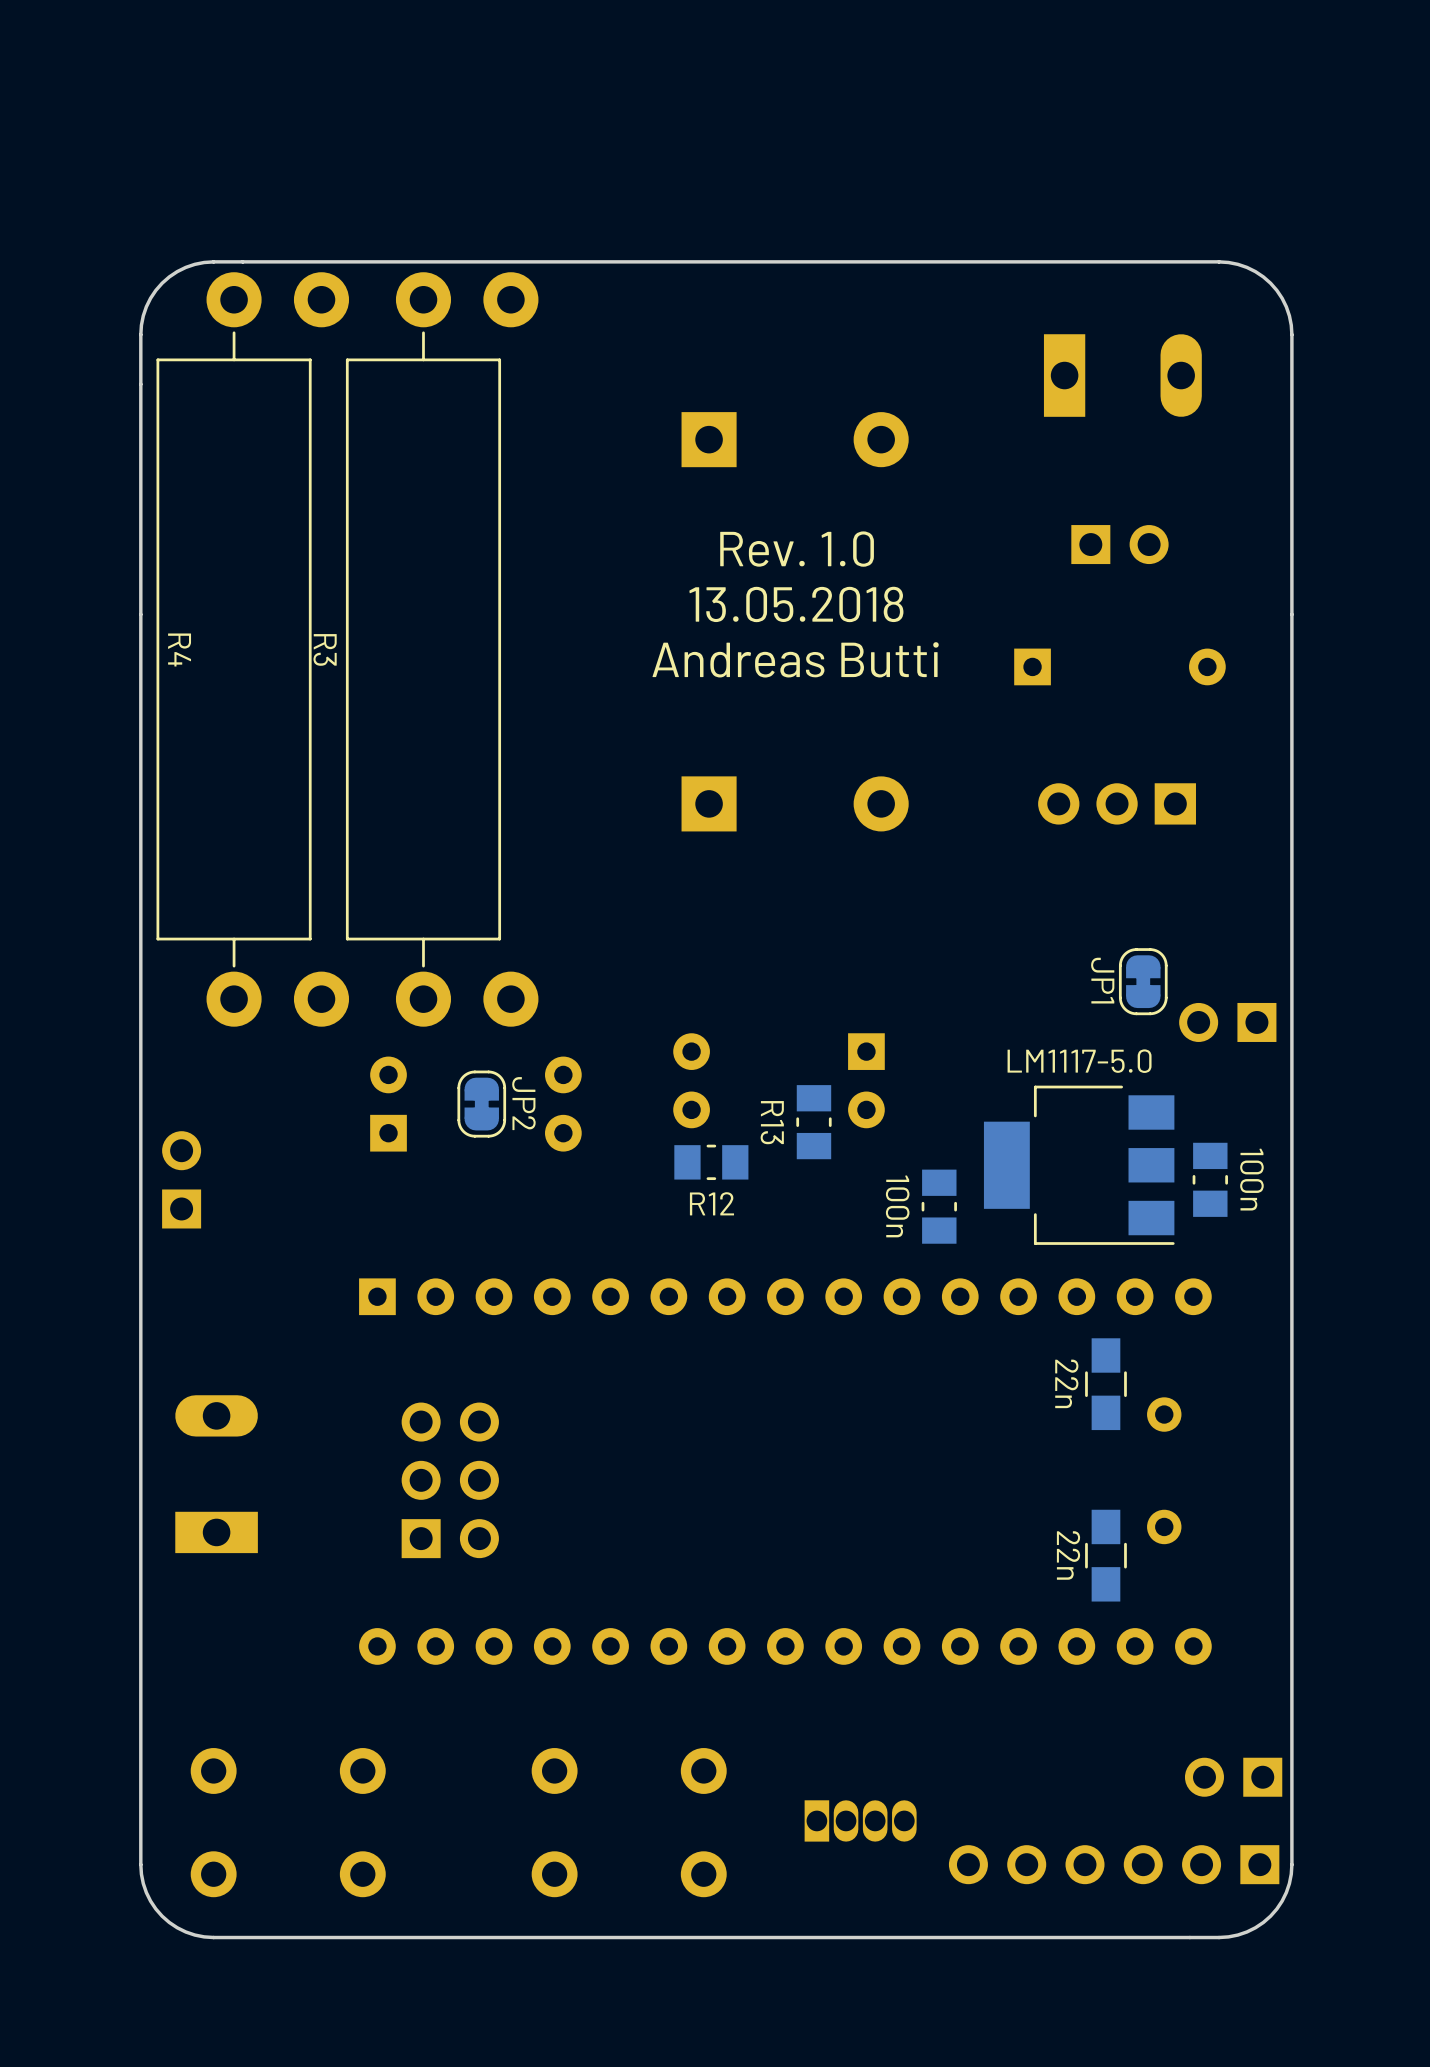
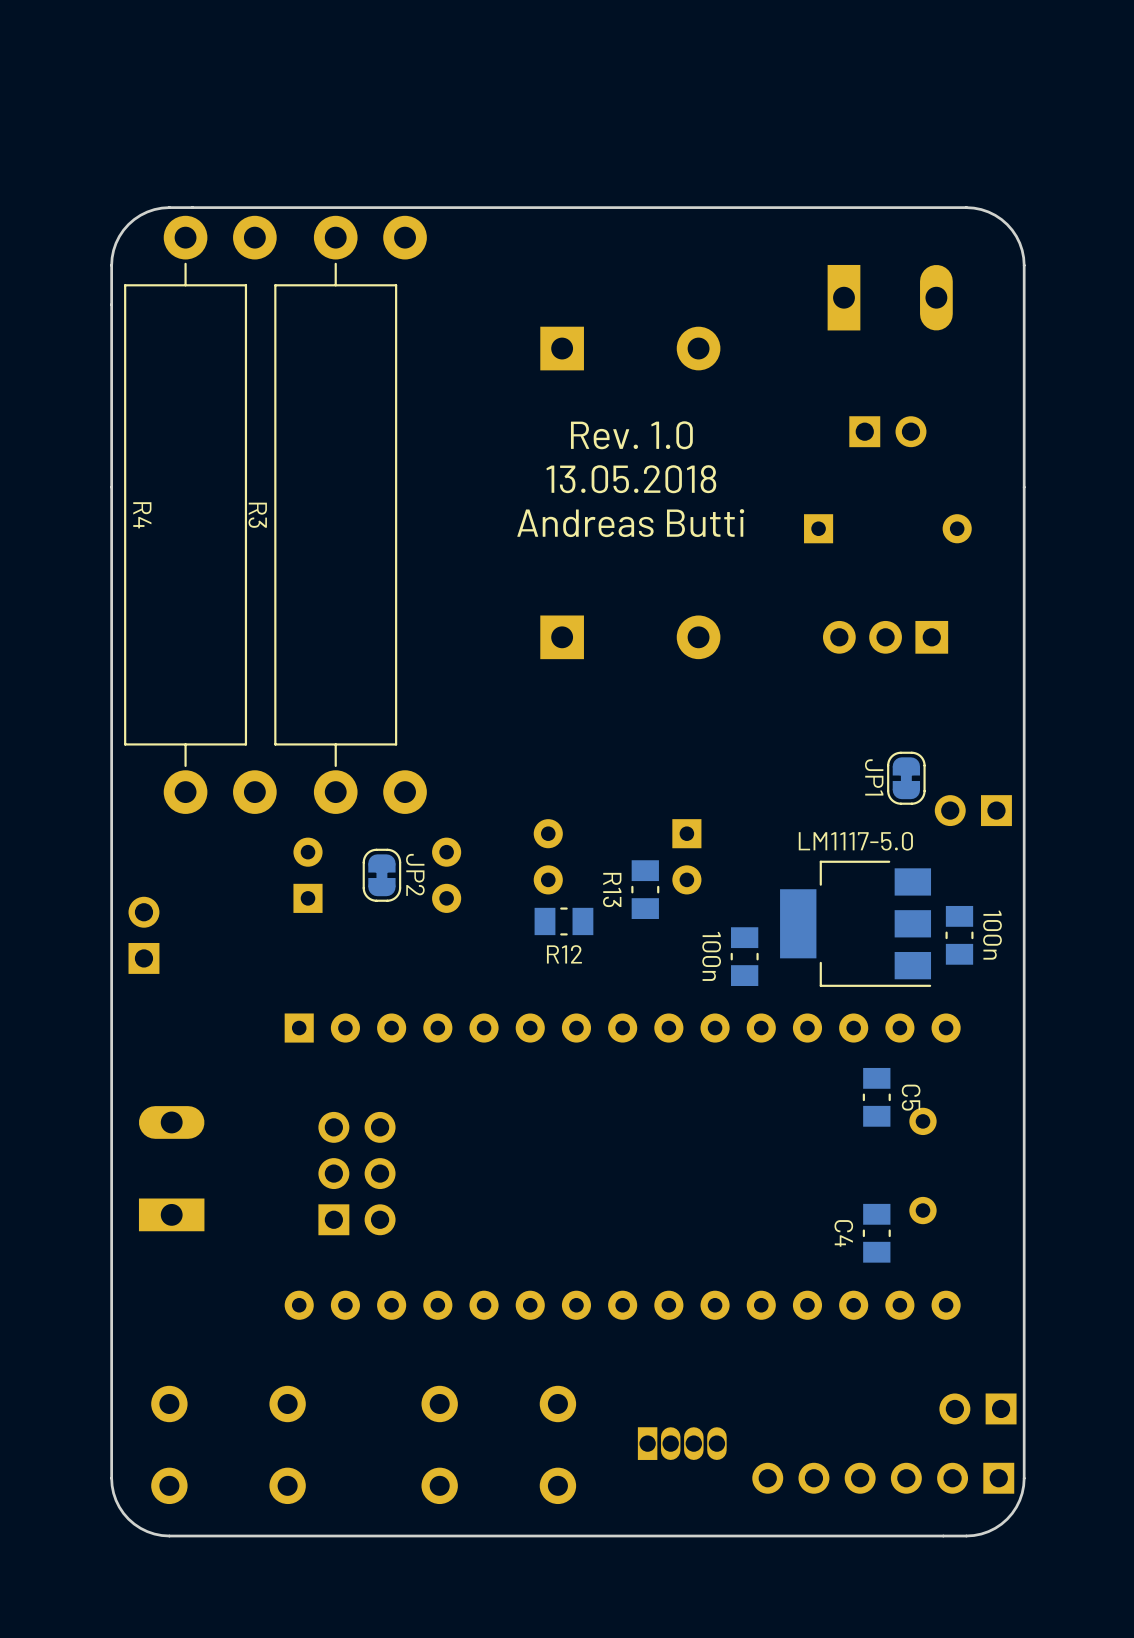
part: 22n (1105, 1384) -> none
C5: none -> (876, 1097)
part: 22n (1105, 1555) -> none
C4: none -> (876, 1233)

